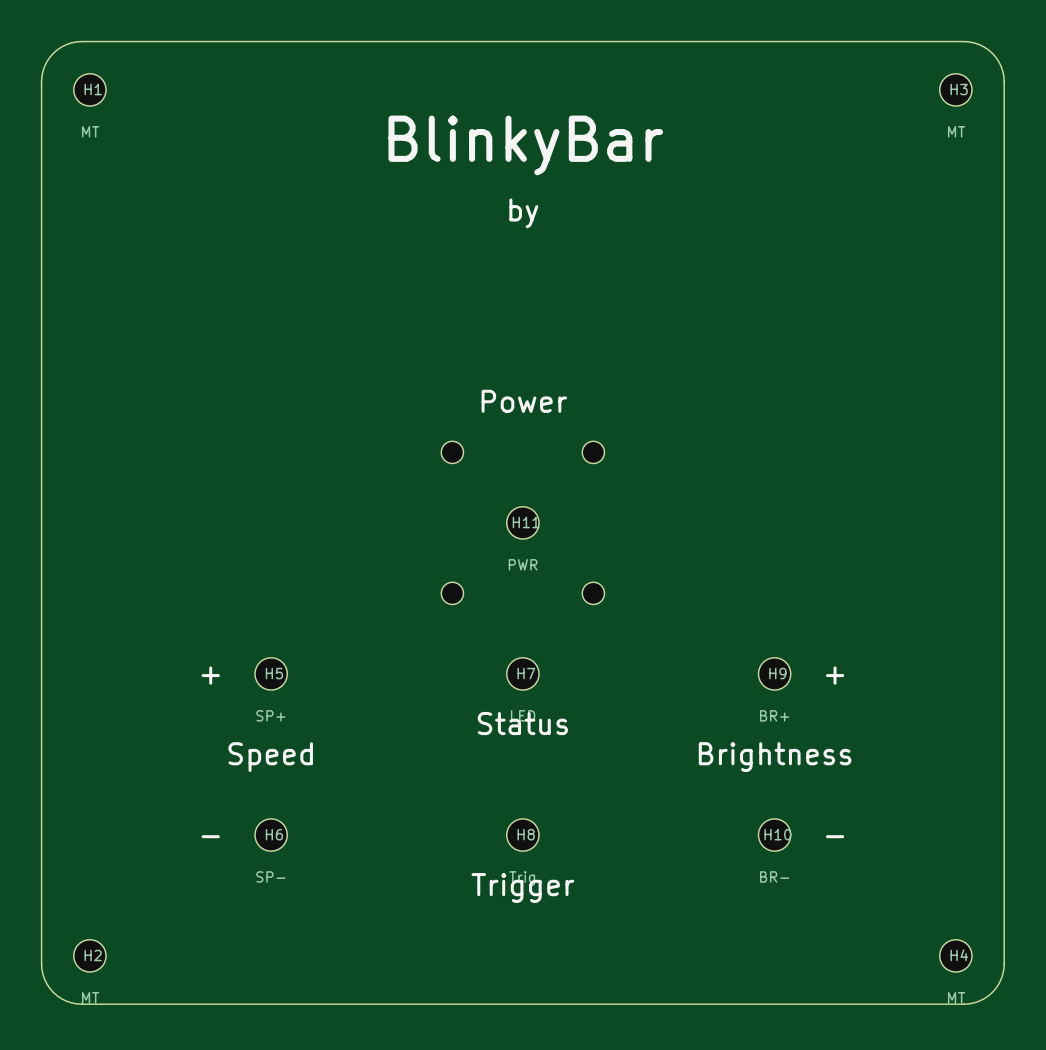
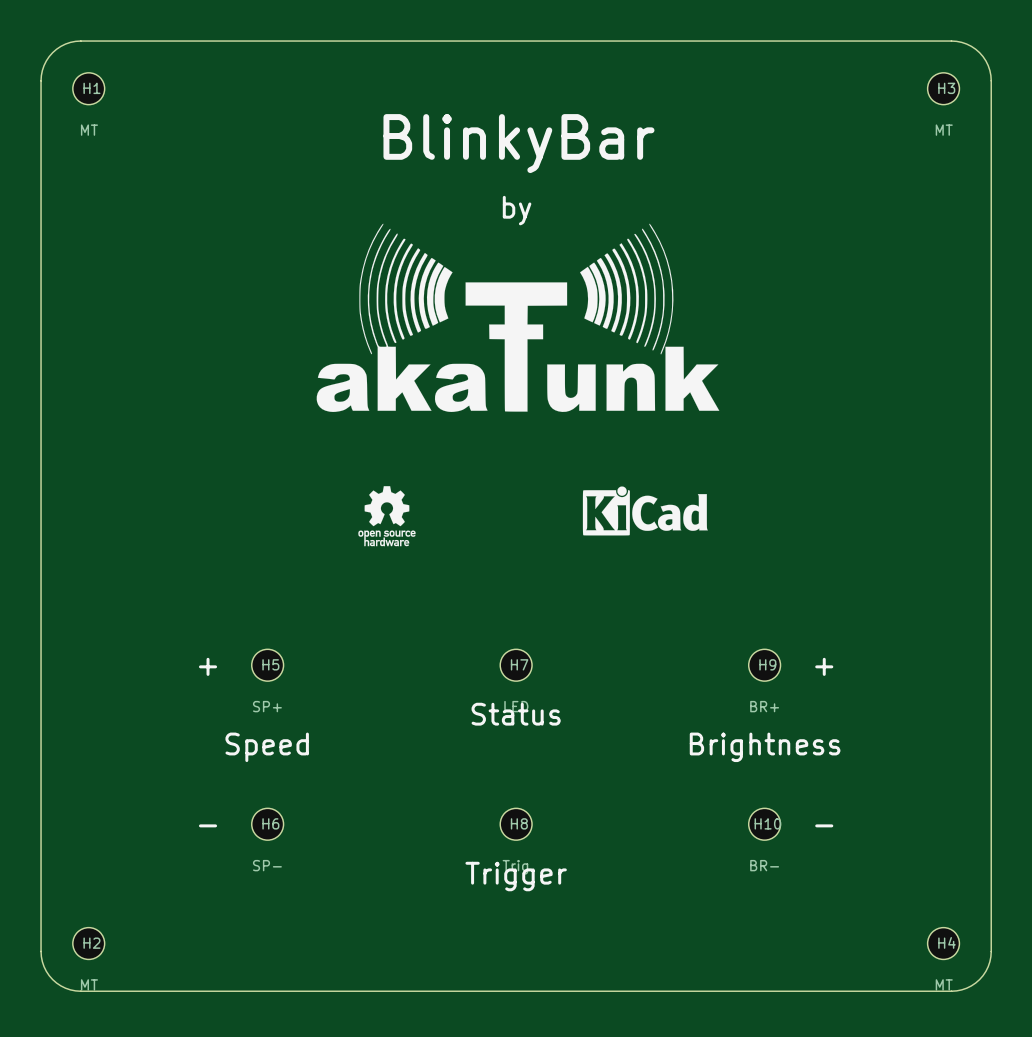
drawing: none -> [316, 223, 720, 412]
text: Power (524, 401) -> none
drawing: none -> [358, 486, 416, 547]
drawing: none -> [582, 486, 708, 536]
H11: PWR (522, 522) -> none

